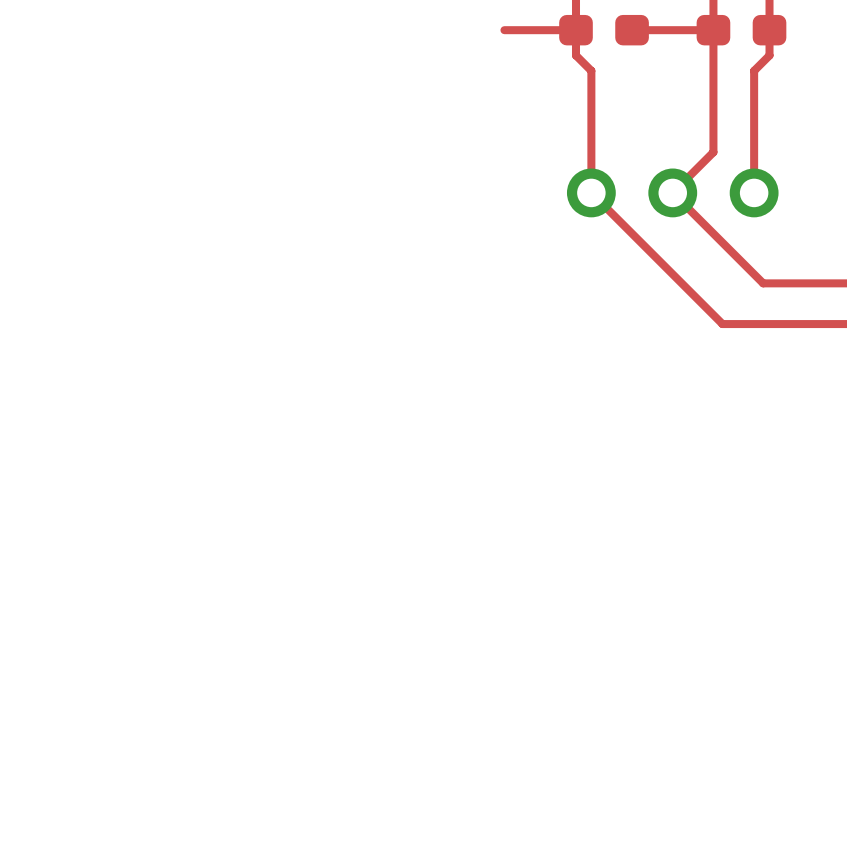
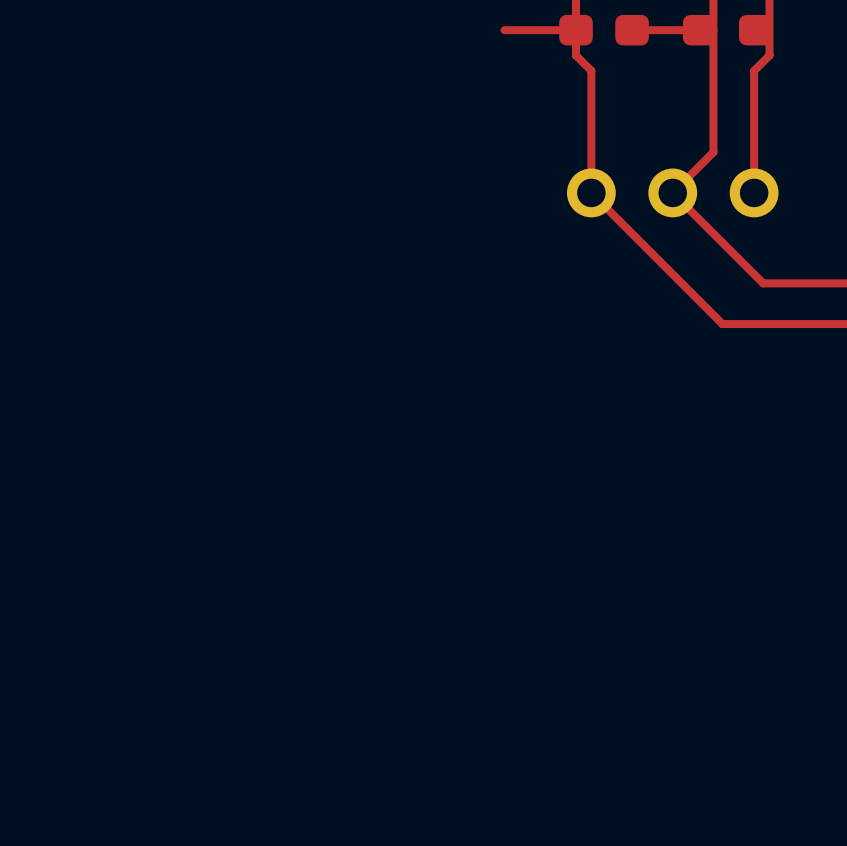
part position: (741, 30) -> (727, 30)

